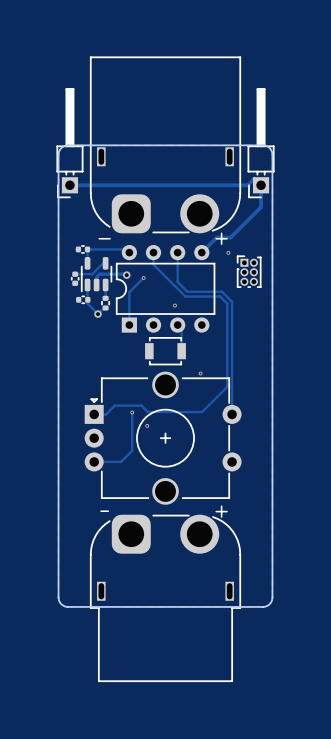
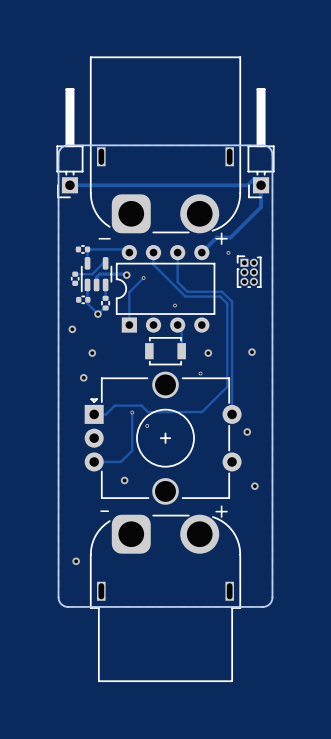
via: none -> (72, 329)
via: none -> (252, 352)
via: none -> (92, 353)
via: none -> (208, 353)
via: none -> (83, 377)
via: none -> (247, 432)
via: none -> (124, 480)
via: none -> (254, 486)
via: none -> (76, 561)

